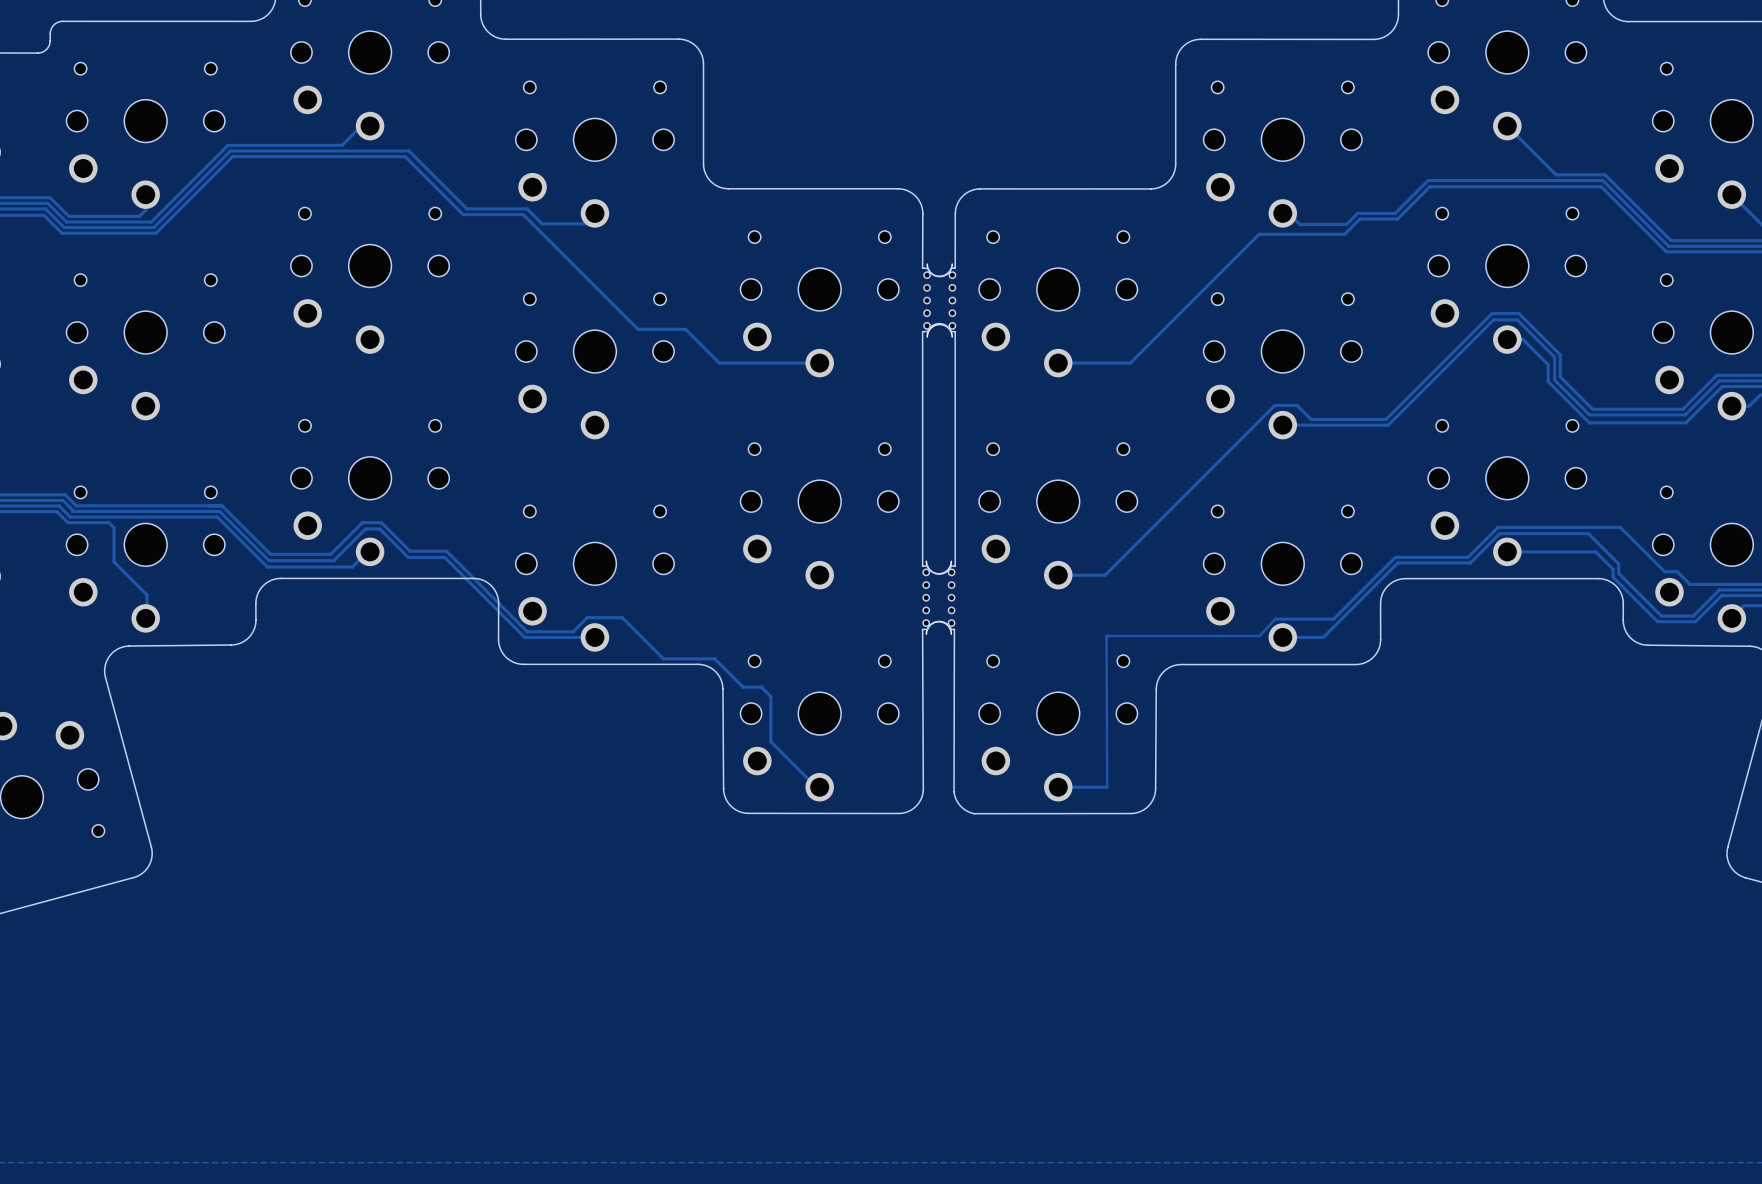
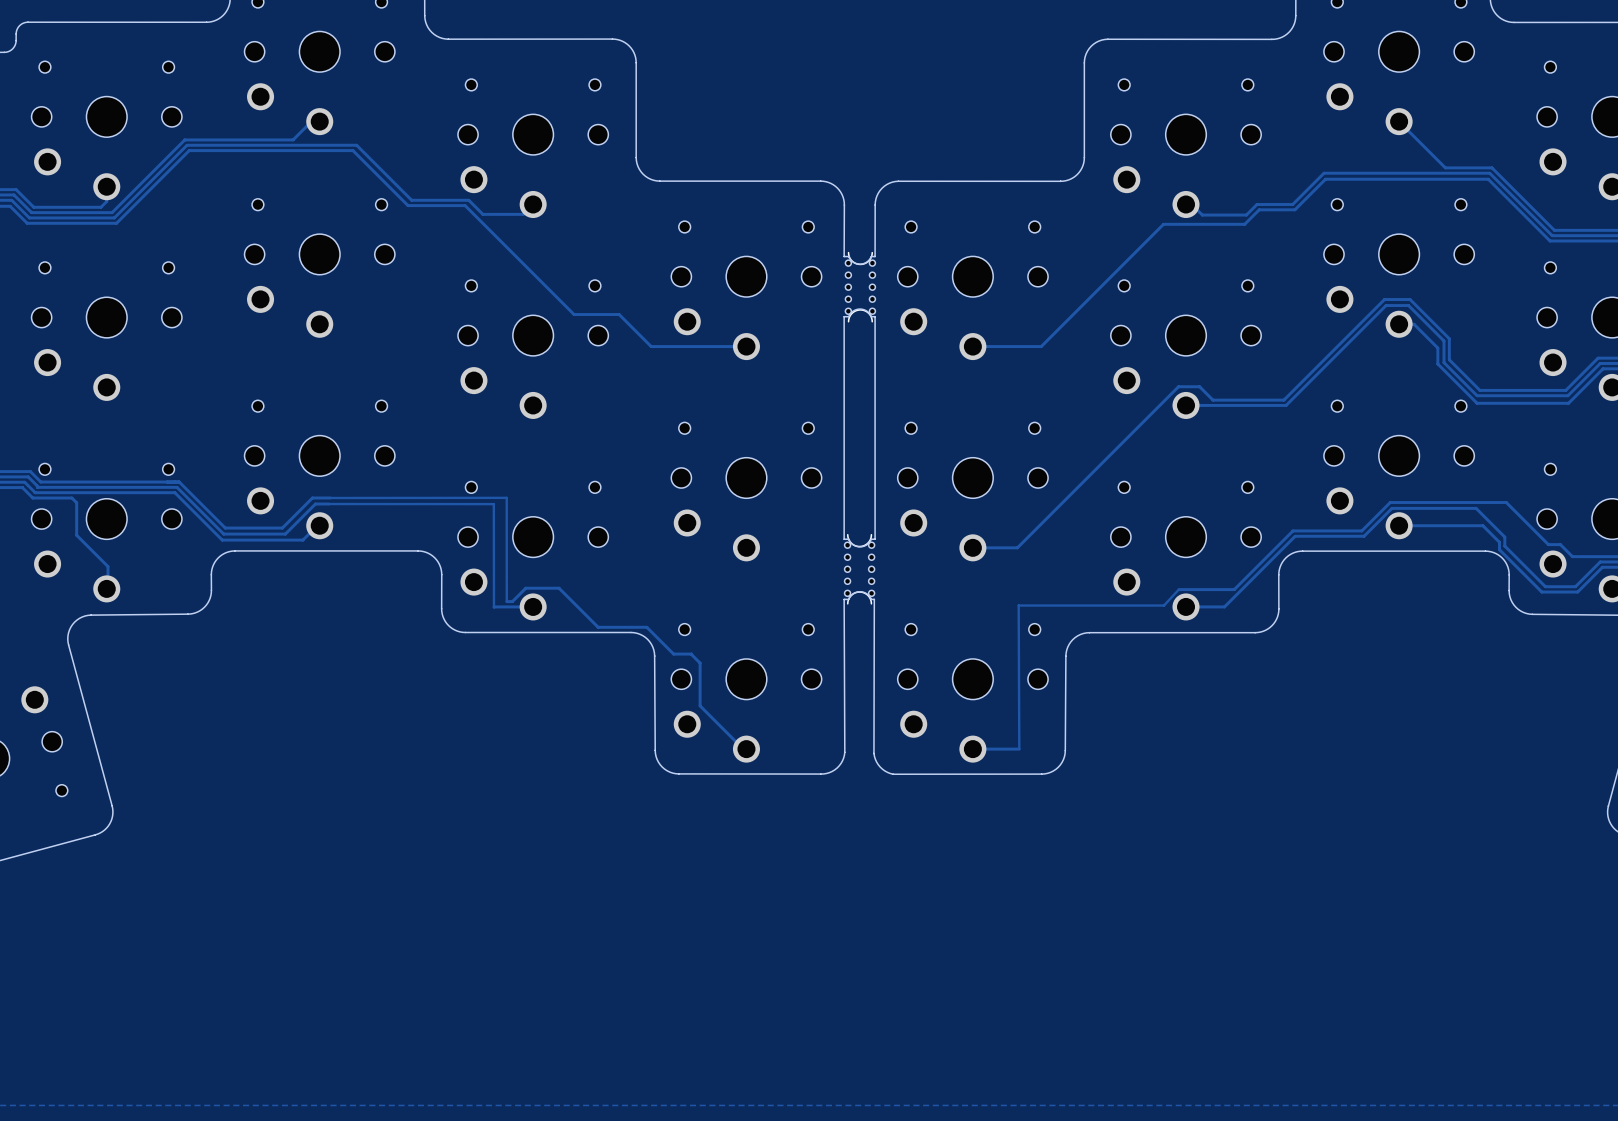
track: (381, 522) (409, 551) (446, 551) (450, 555) -> none
track: (379, 528) (408, 557) (444, 557) (524, 637) (553, 637) -> (328, 504) (493, 504) (494, 606)
track: (450, 555) (527, 631) (567, 631) -> (330, 497) (506, 497) (506, 601)

